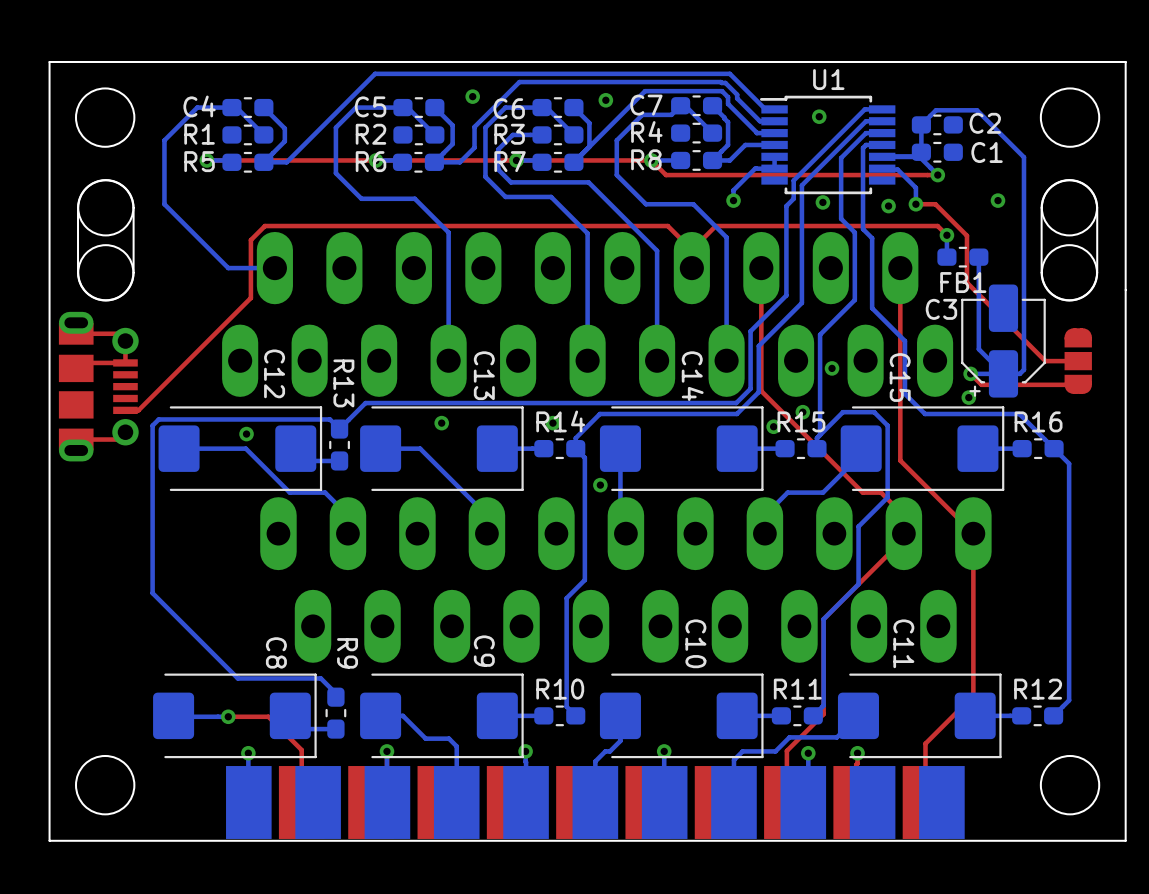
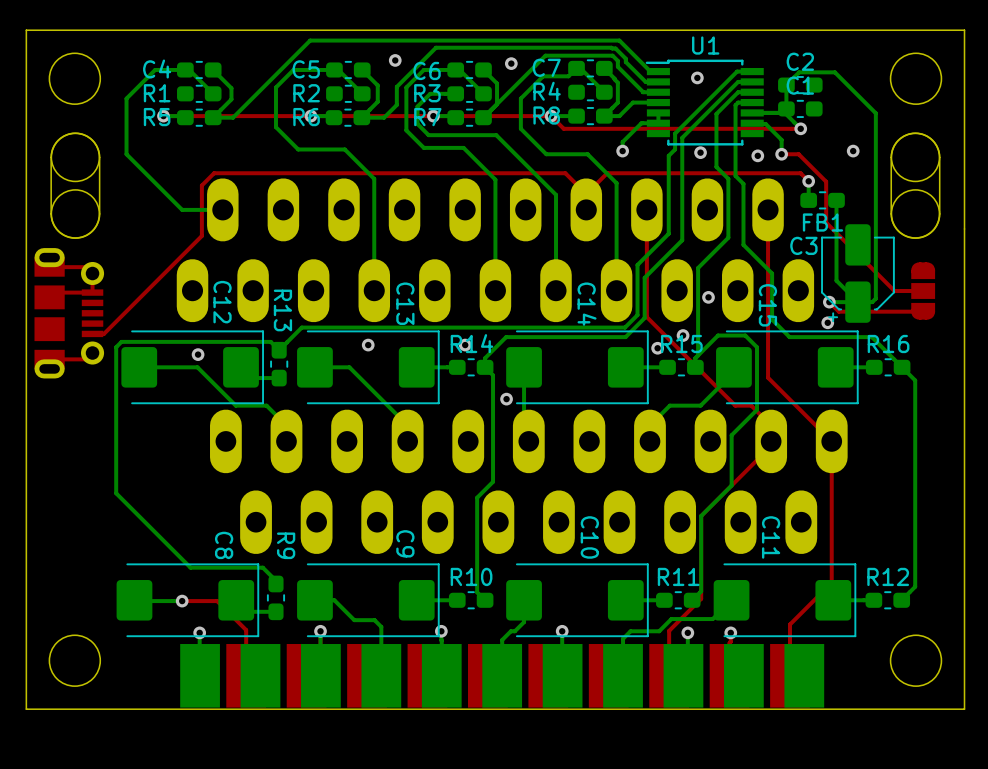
C2 name position: C2 (985, 123) -> C2 (800, 61)
C1 name position: C1 (987, 152) -> C1 (800, 85)

